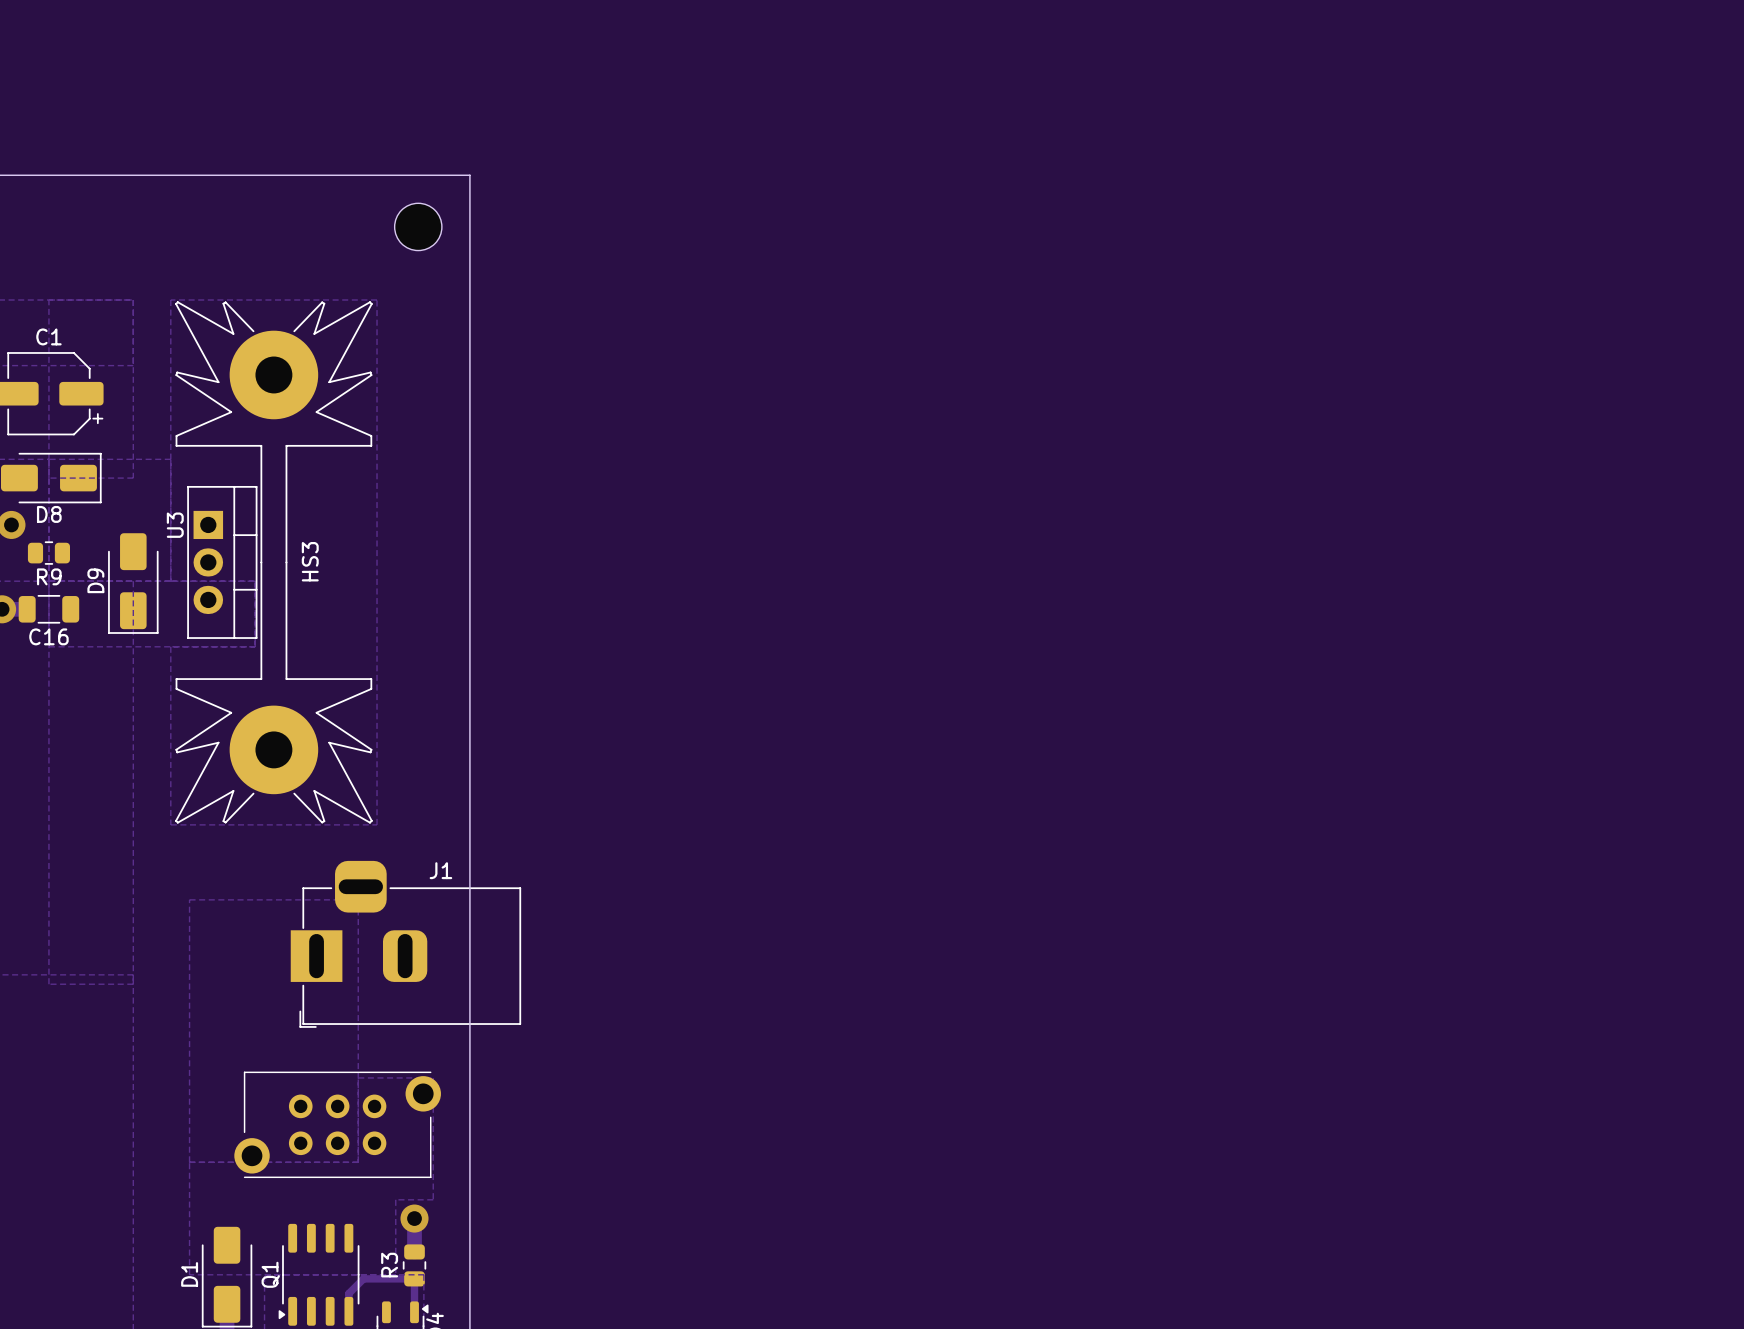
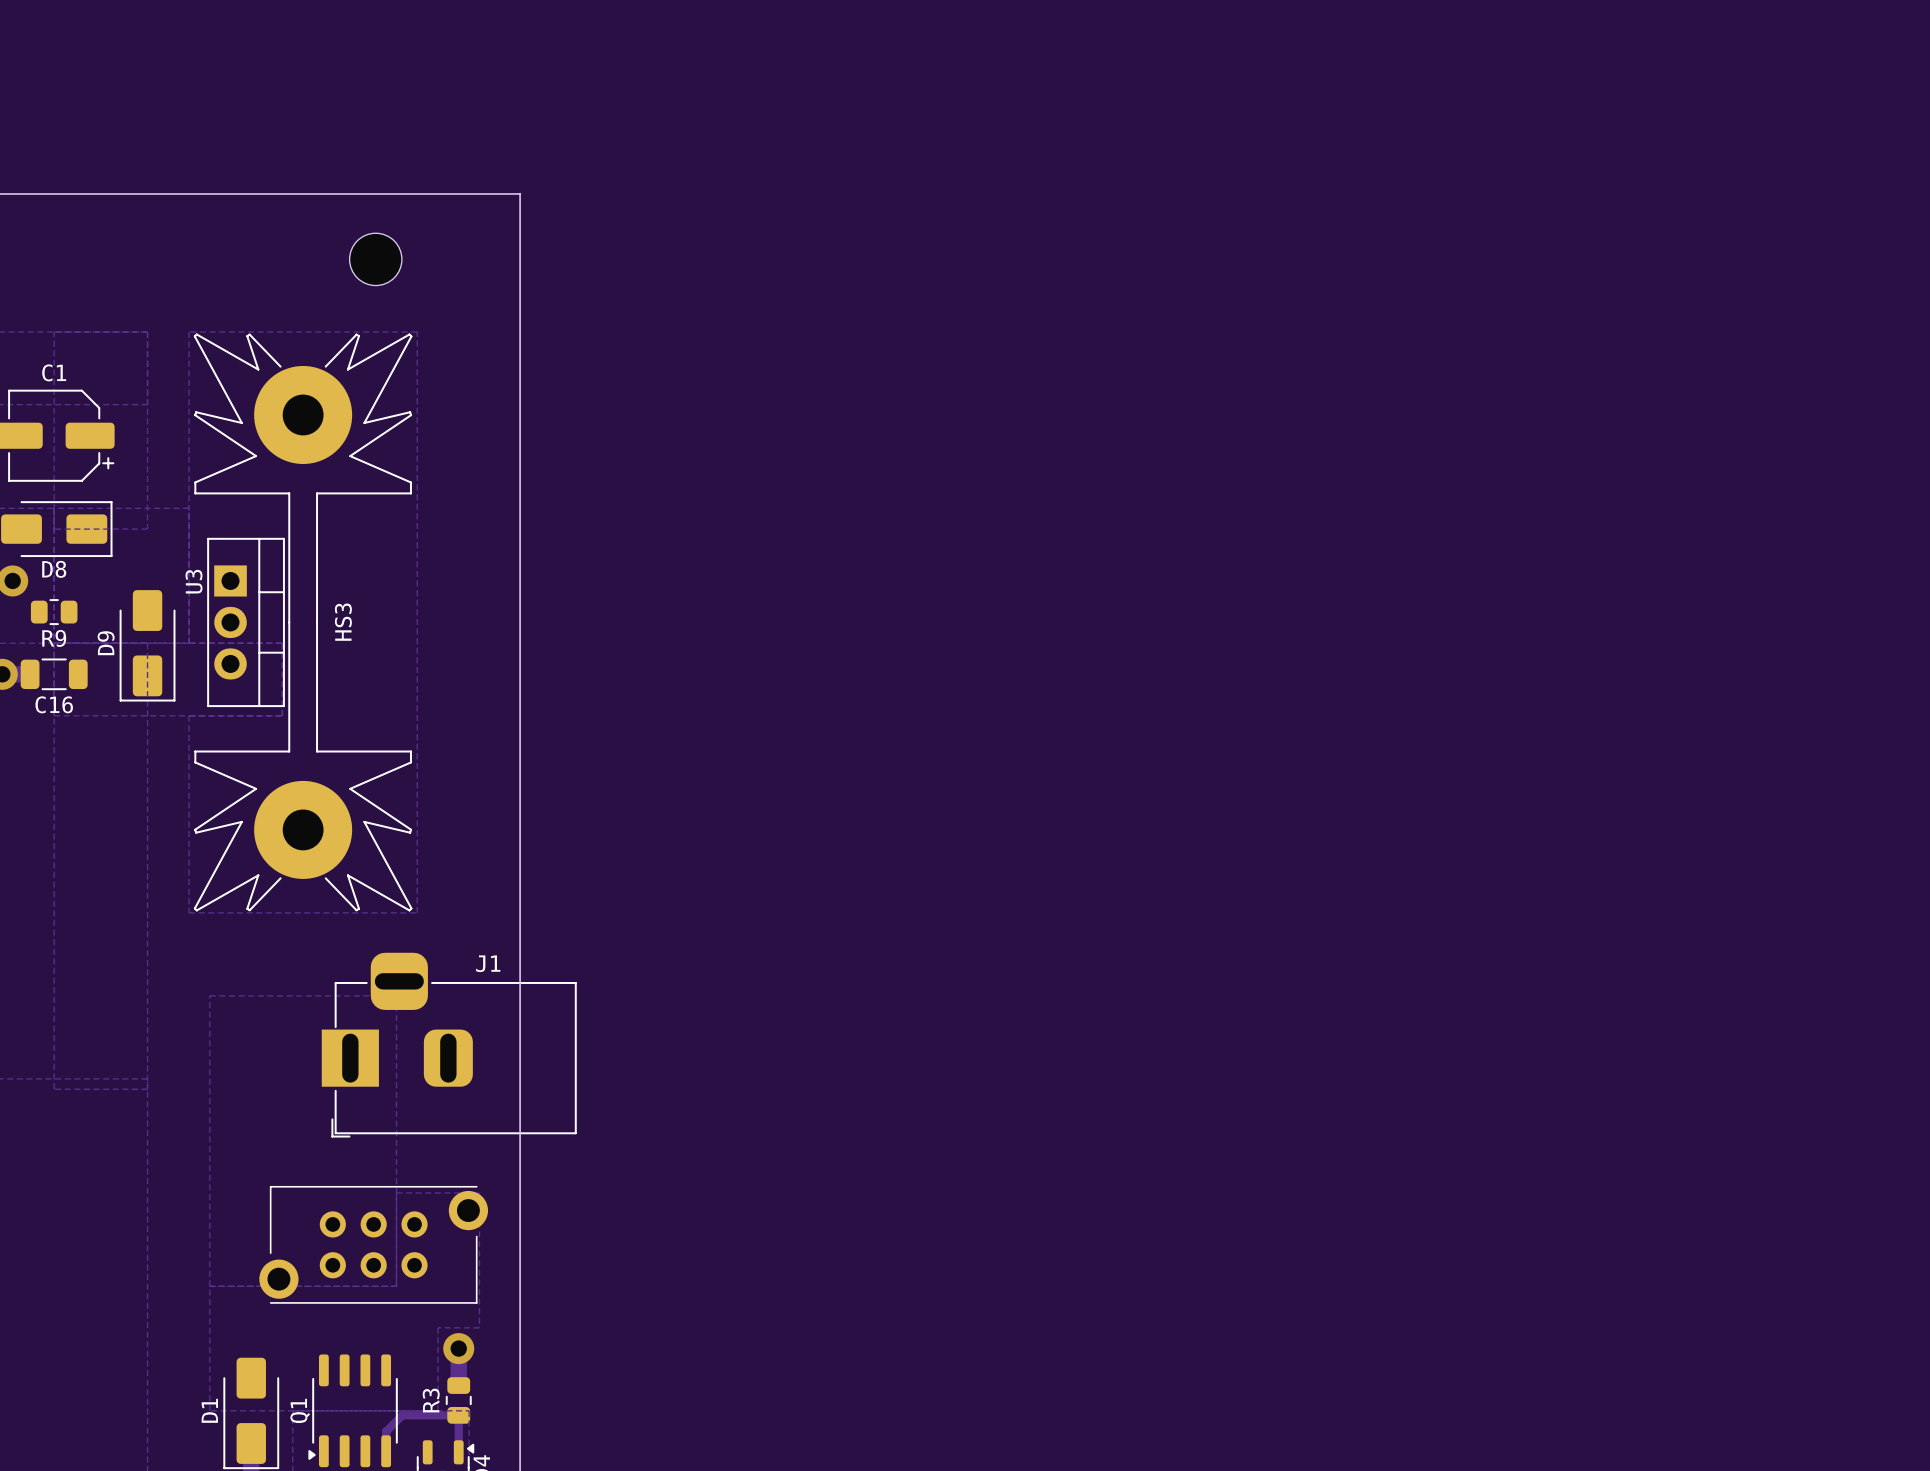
part position: (418, 226) -> (375, 259)

